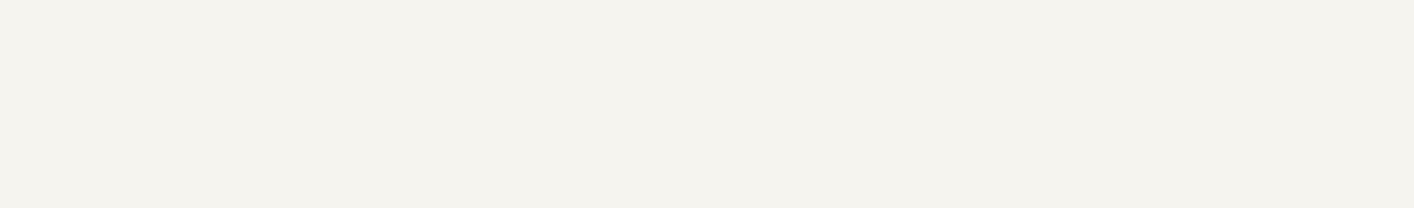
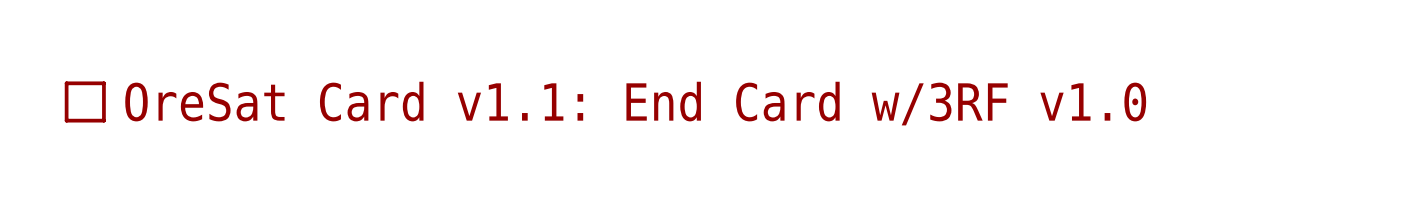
part: none -> (85, 101)

